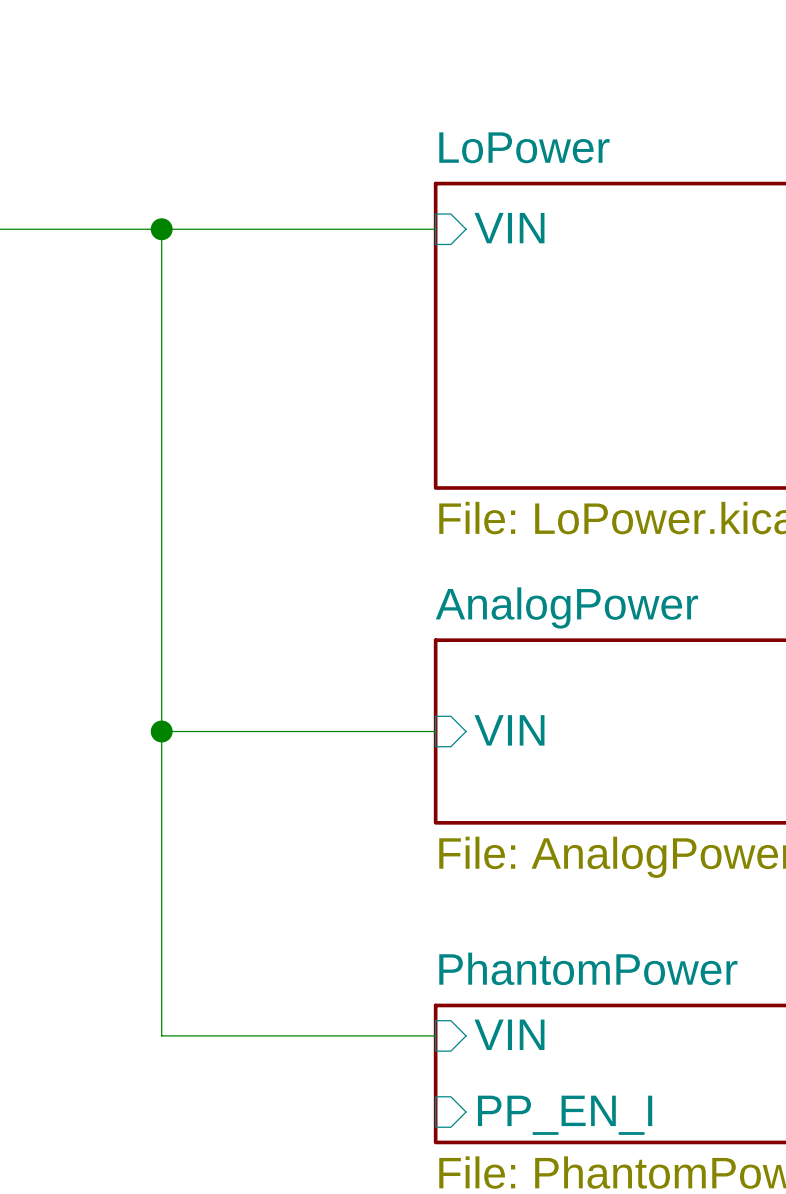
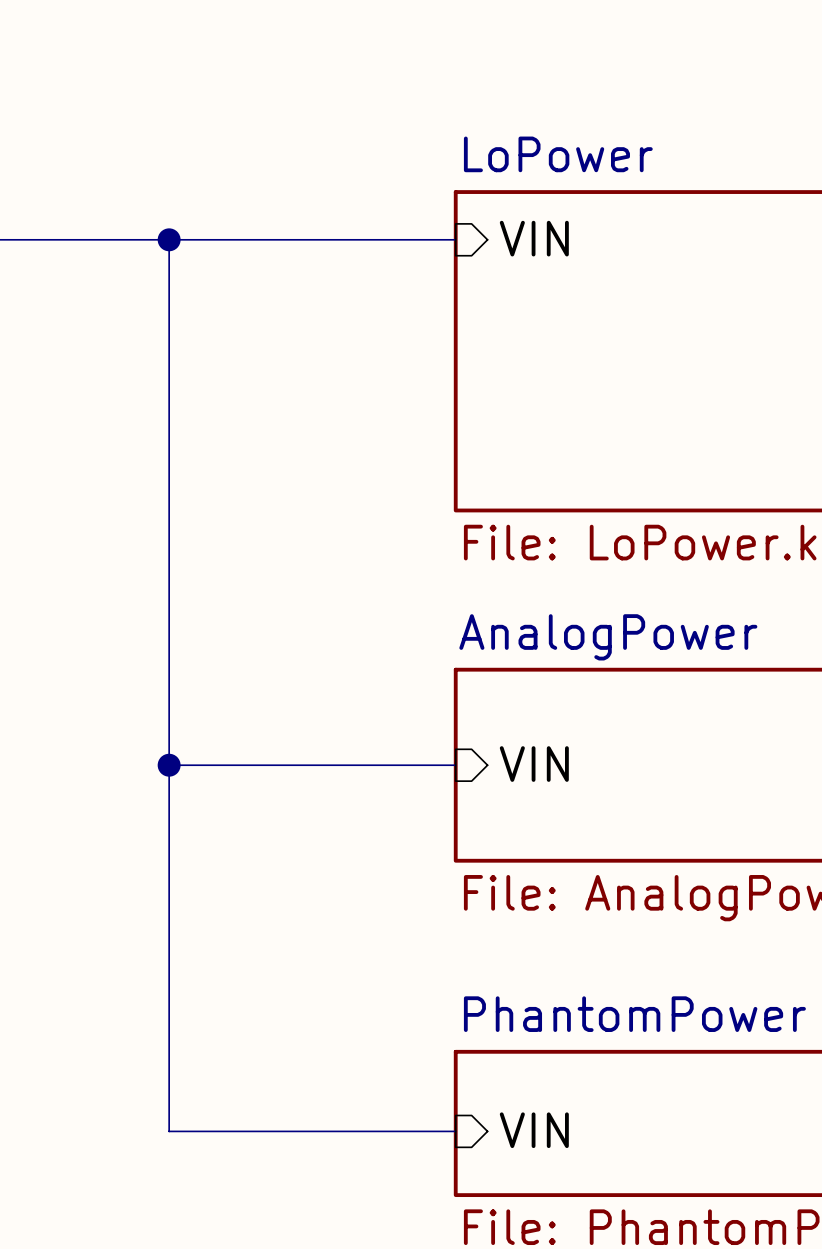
sheet pin position: VIN (509, 1034) -> VIN (534, 1130)
wire: (161, 1035) (435, 1035) -> (169, 1083) (169, 1131) (455, 1131)
sheet pin: PP_EN_I (565, 1115) -> none

